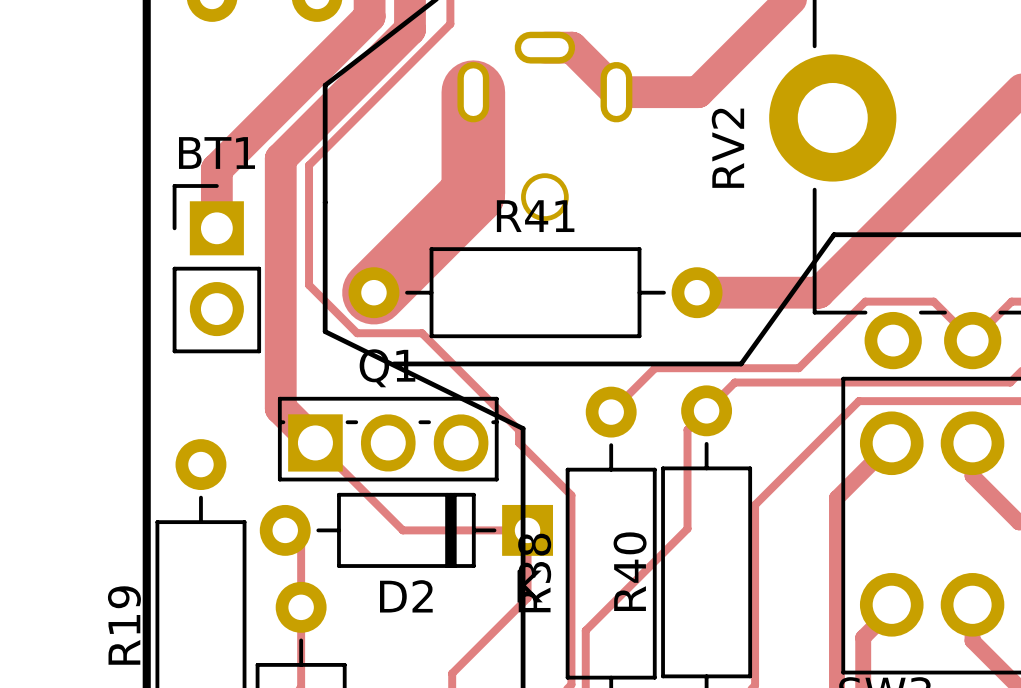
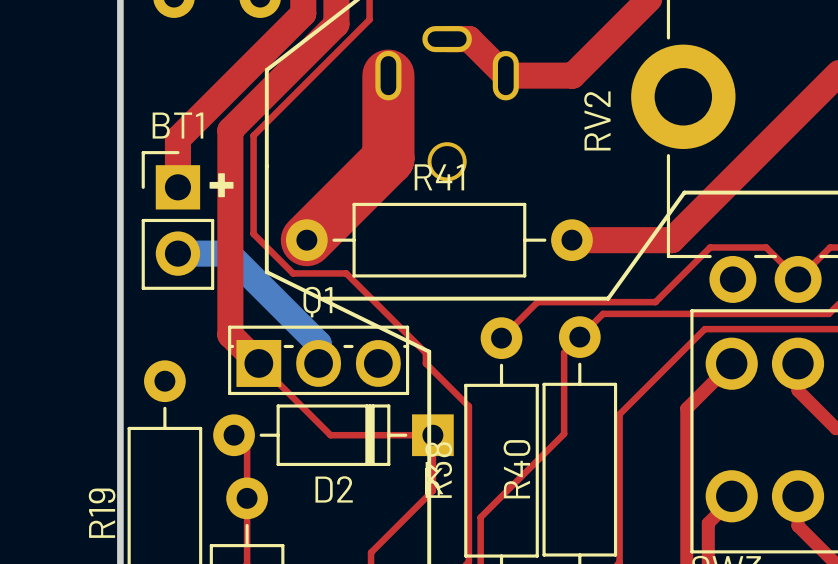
text: none -> + (221, 185)
bottom track: none -> (177, 253) (228, 253) (318, 343) (318, 363)

